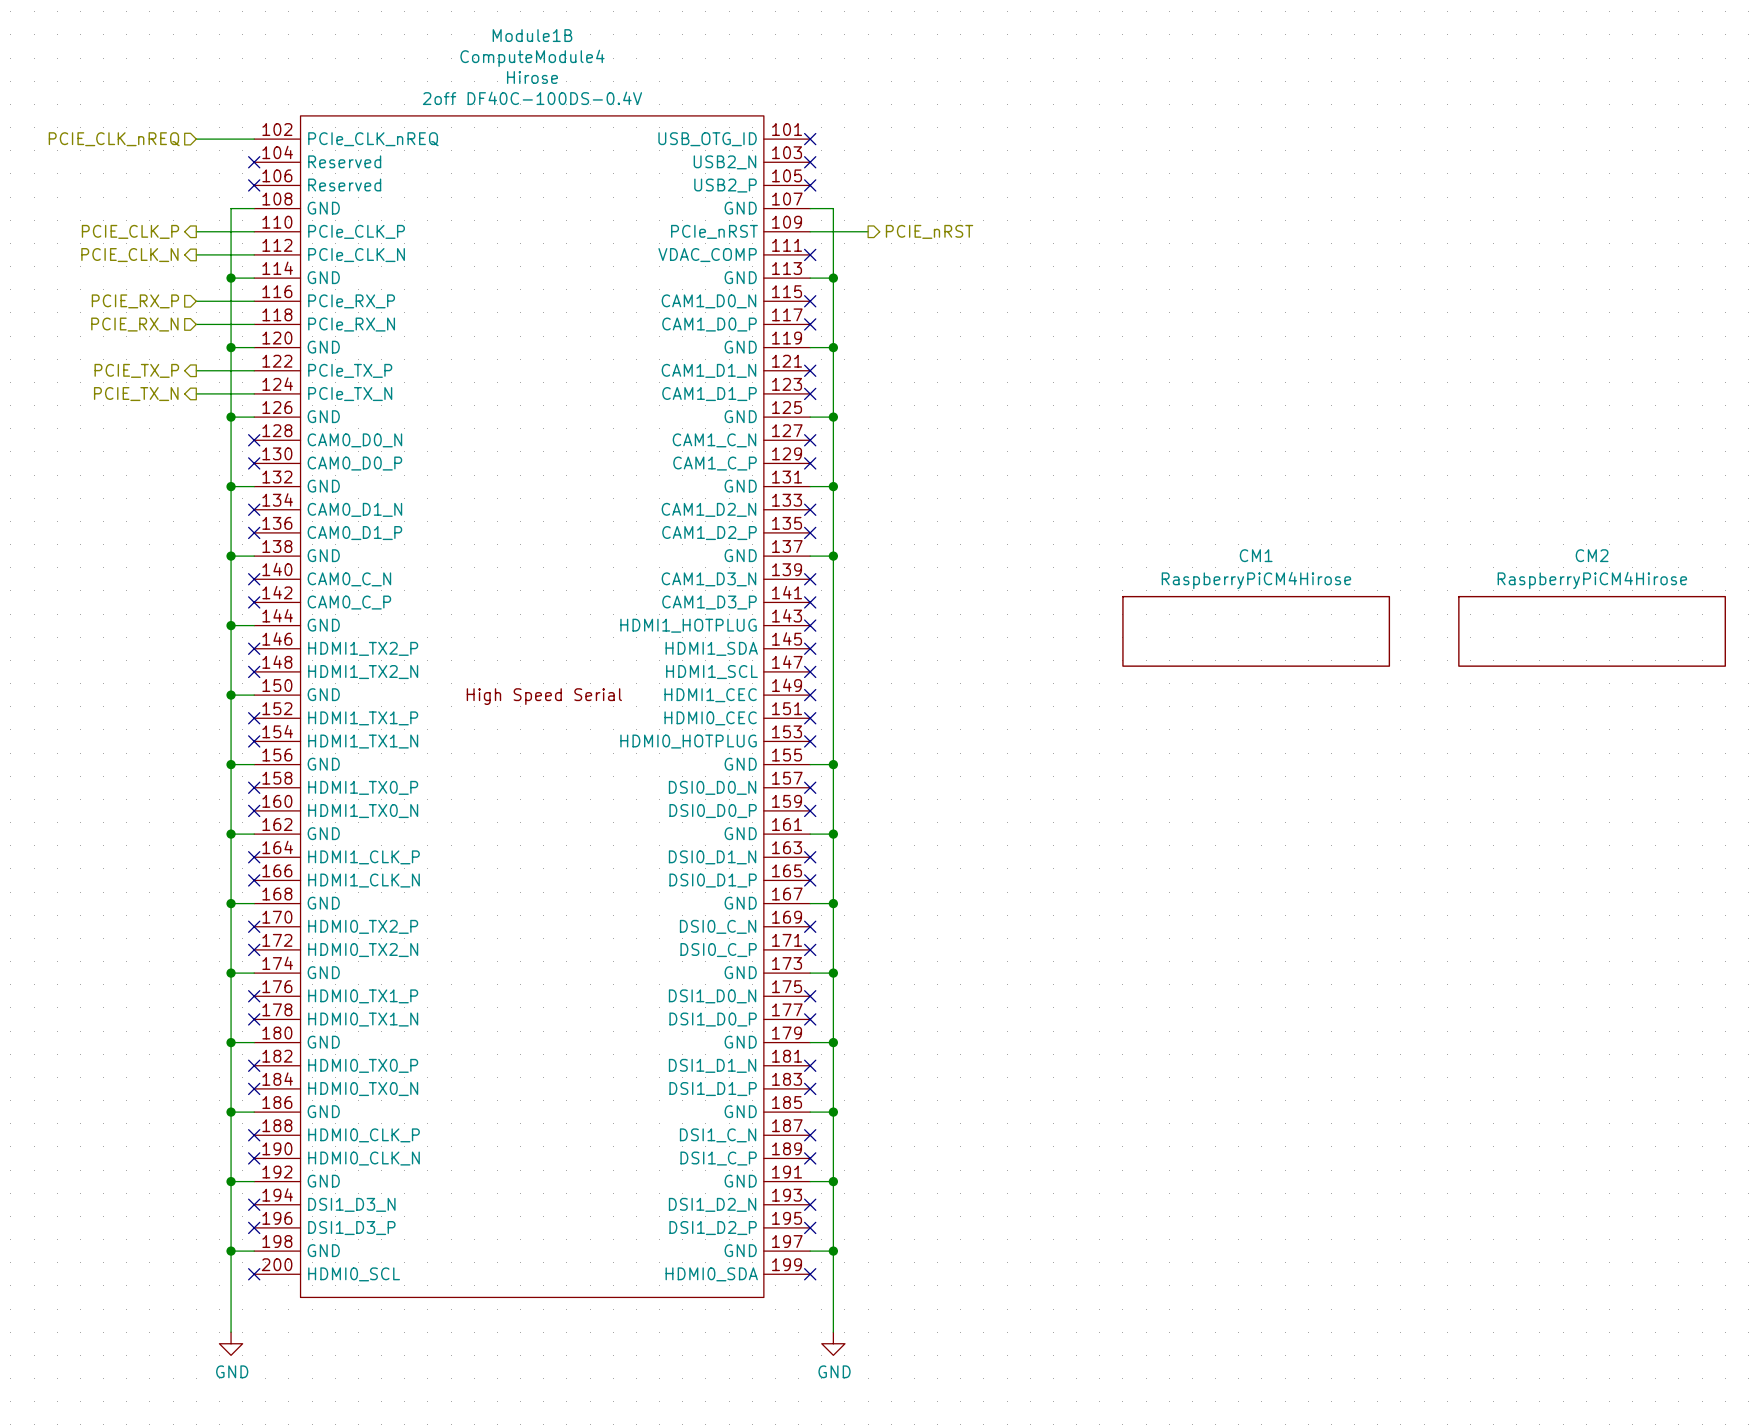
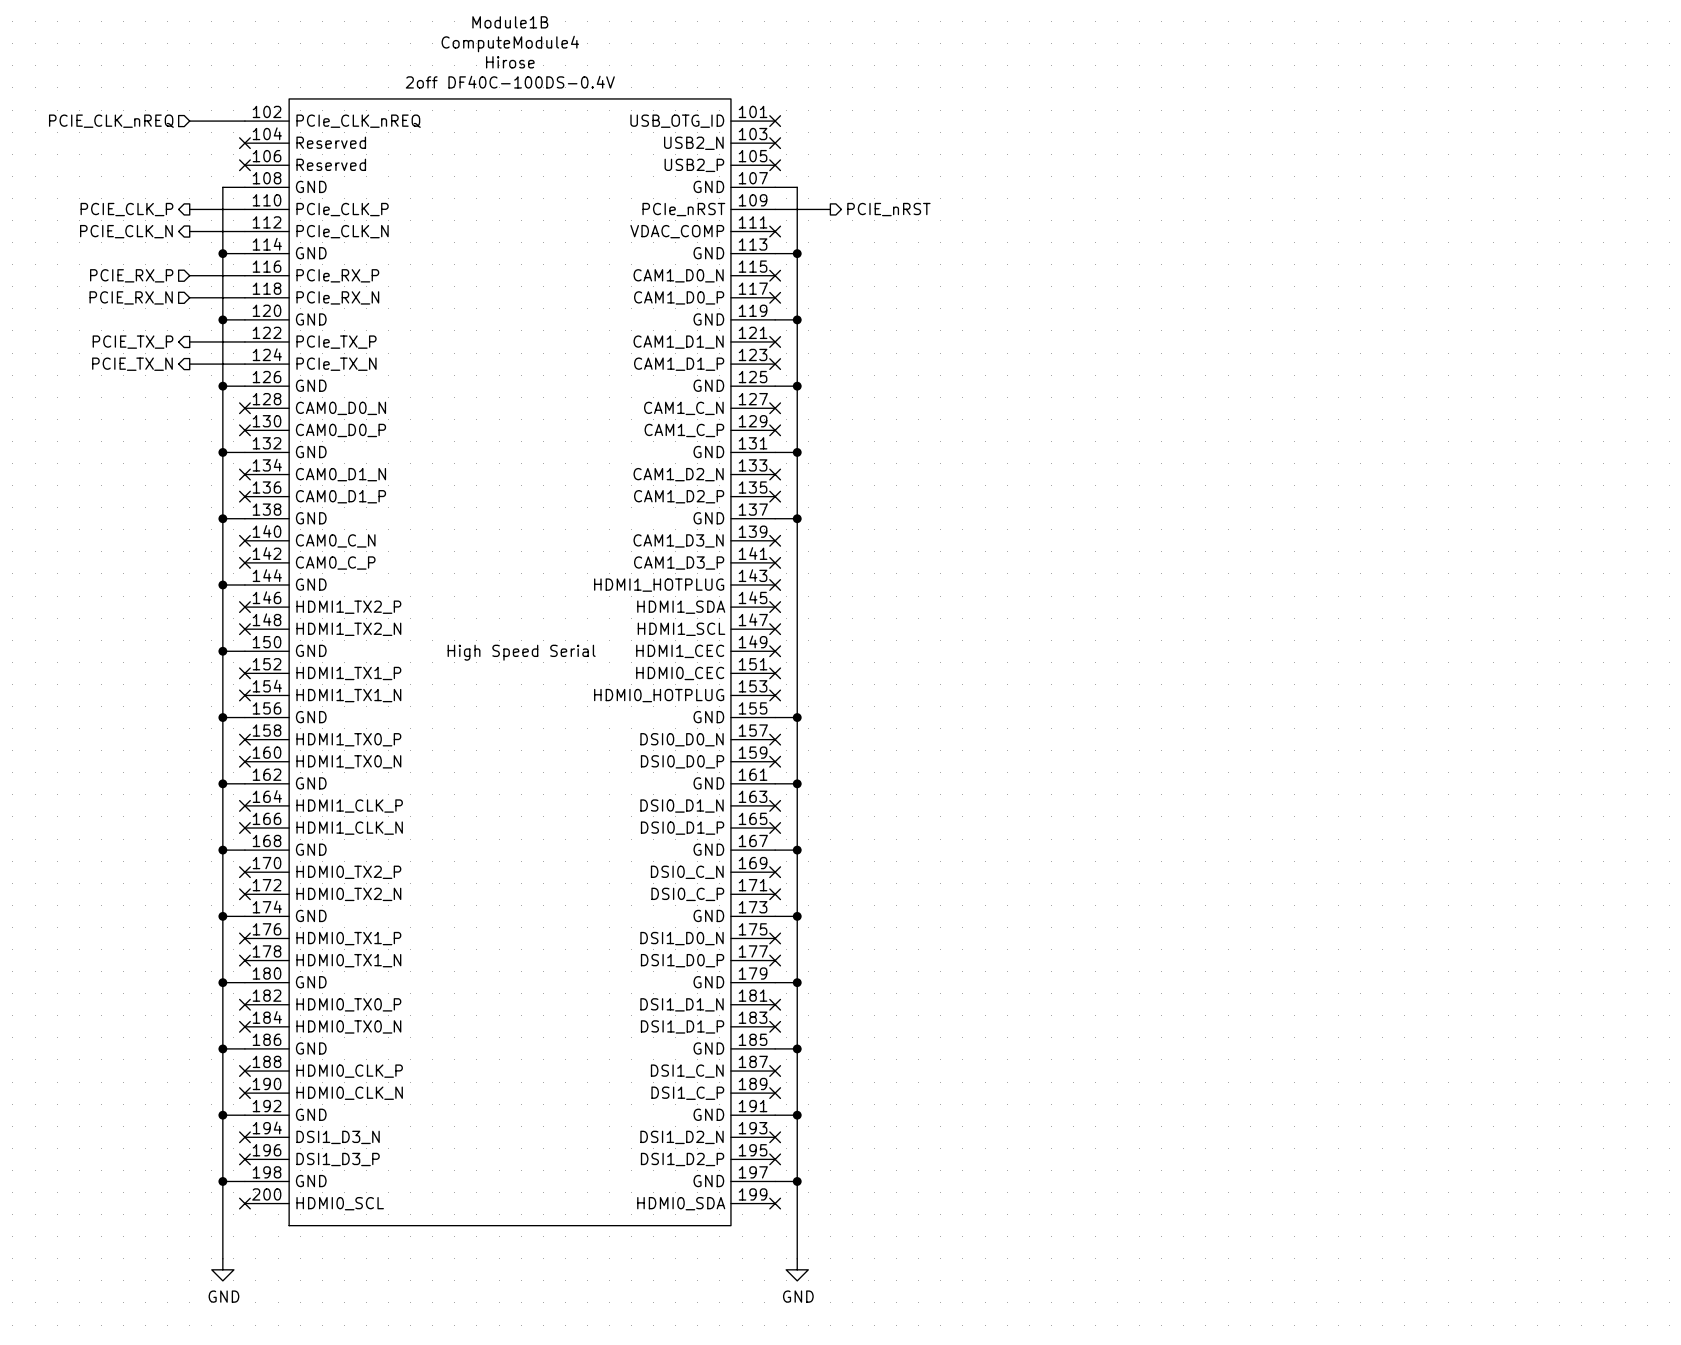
CM1: RaspberryPiCM4Hirose (1256, 631) -> none
CM2: RaspberryPiCM4Hirose (1592, 631) -> none

